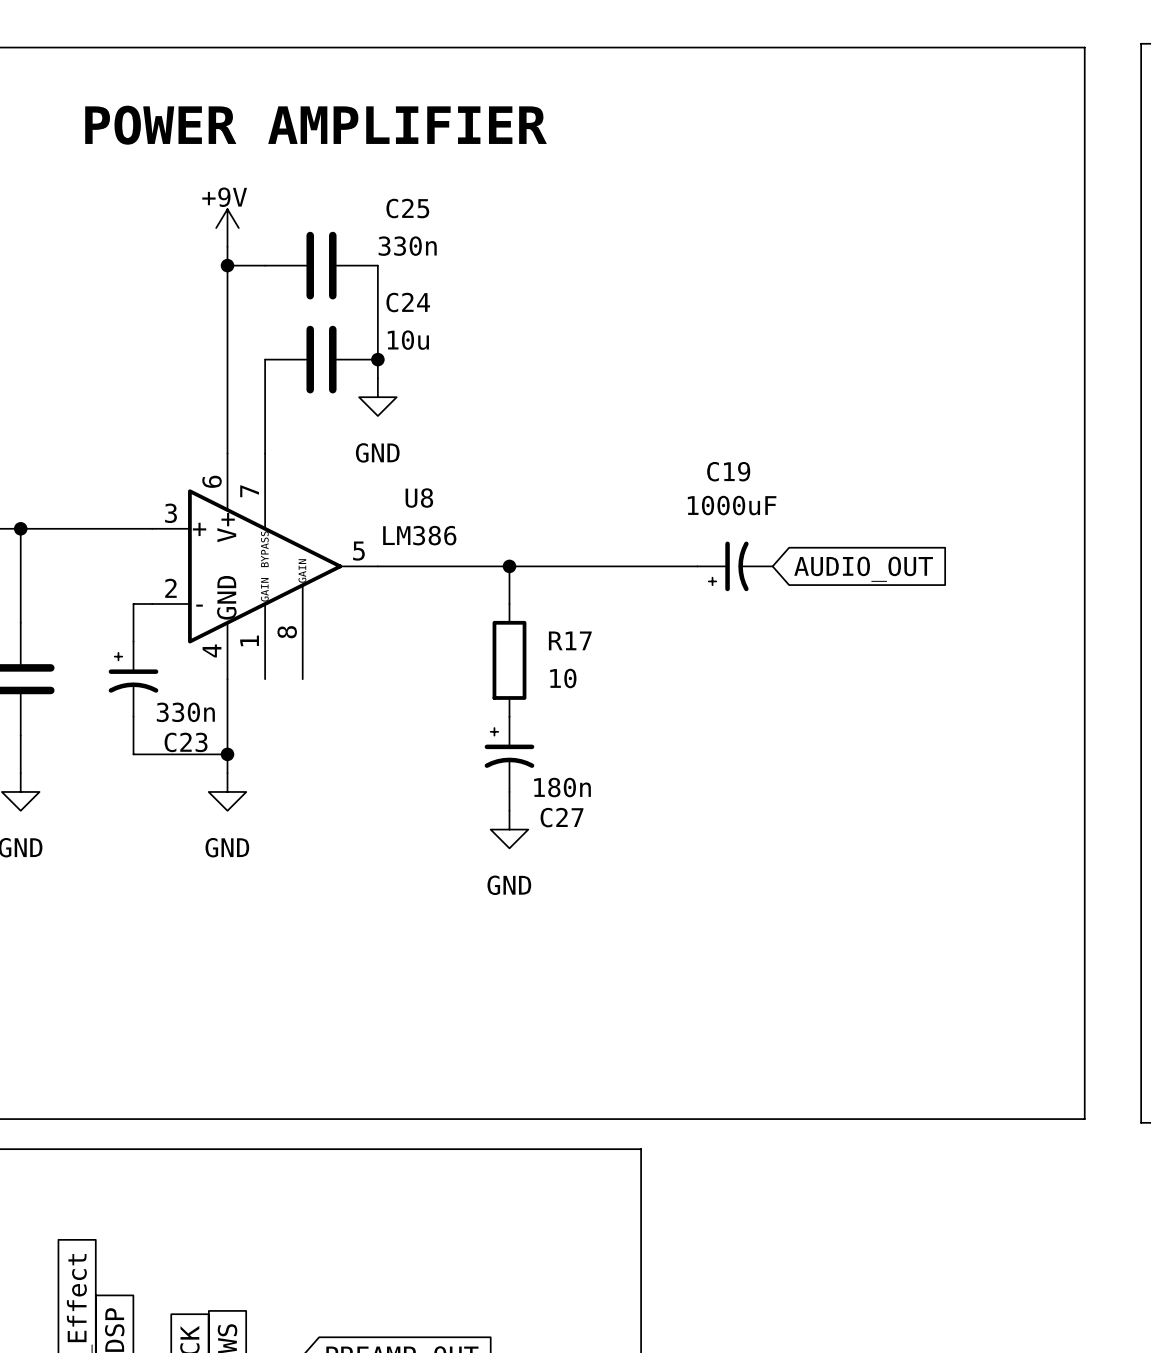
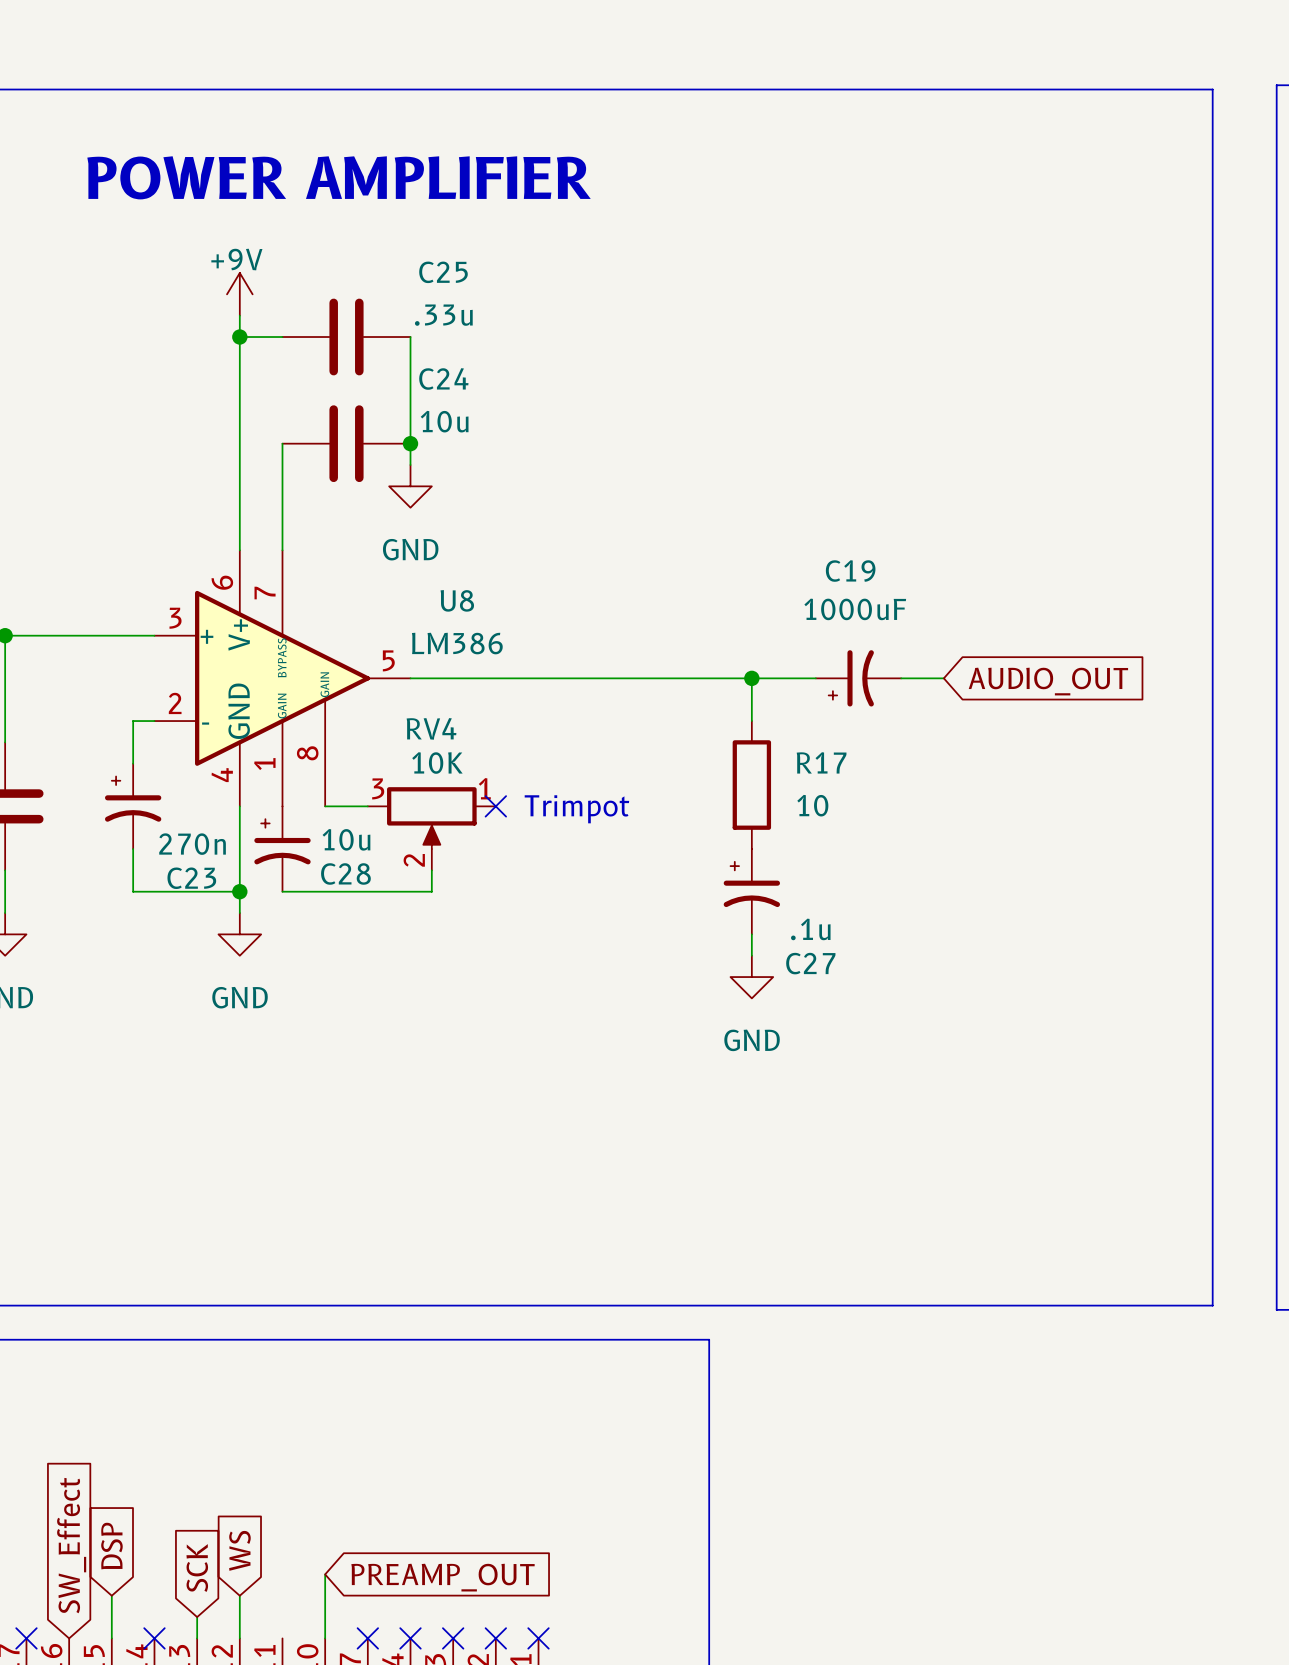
C25 value: 330n (407, 246) -> .33u (443, 315)
wire: (509, 566) (509, 603) -> (751, 678) (751, 721)
junction: (509, 566) -> none
junction: none -> (751, 678)
C19 position: (735, 566) -> (858, 678)
wire: none -> (901, 678) (943, 678)
global label position: AUDIO_OUT (863, 569) -> AUDIO_OUT (1048, 681)
R17 position: (509, 660) -> (751, 785)
wire: none -> (325, 806) (367, 806)
no-connect mark: none -> (495, 806)
text: none -> Trimpot (576, 809)
RV4: none -> 10K (431, 828)
C23 value: 330n (185, 712) -> 270n (192, 844)
C28: none -> 10u (282, 849)
wire: none -> (431, 870) (431, 891) (282, 891)
C27 position: (509, 754) -> (751, 891)
C27 value: 180n (562, 787) -> .1u (810, 929)
wire: (509, 791) (509, 810) -> (751, 934) (751, 955)
power symbol position: GND (509, 829) -> GND (751, 977)

